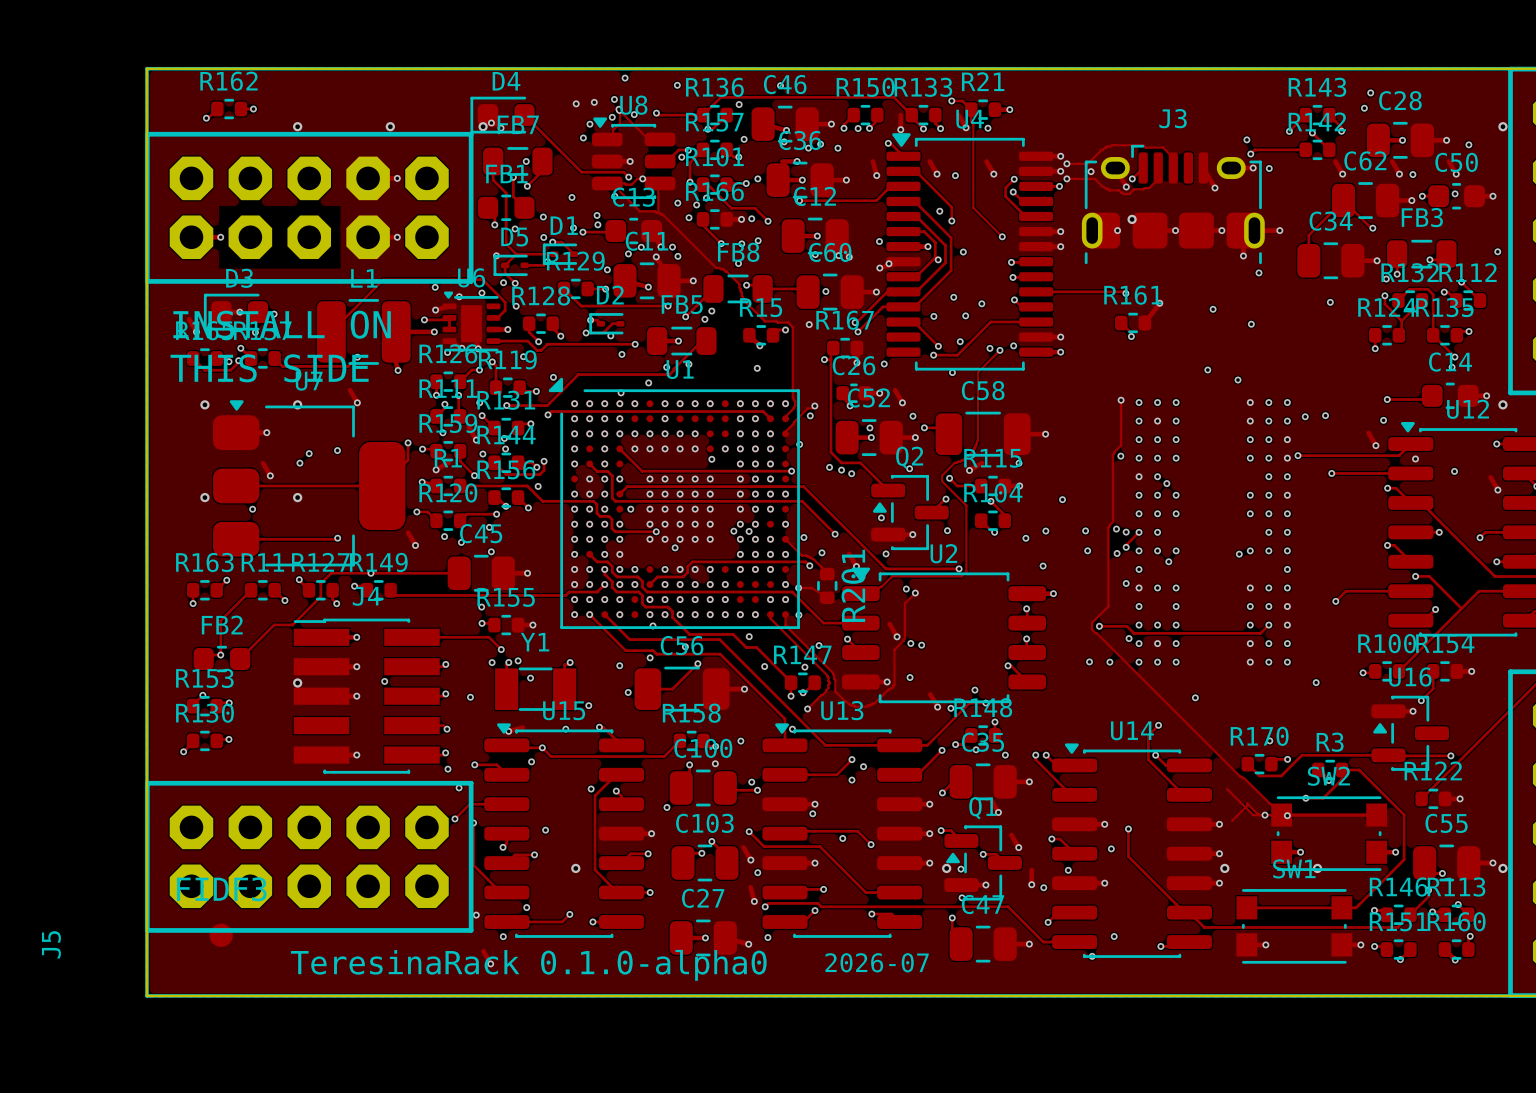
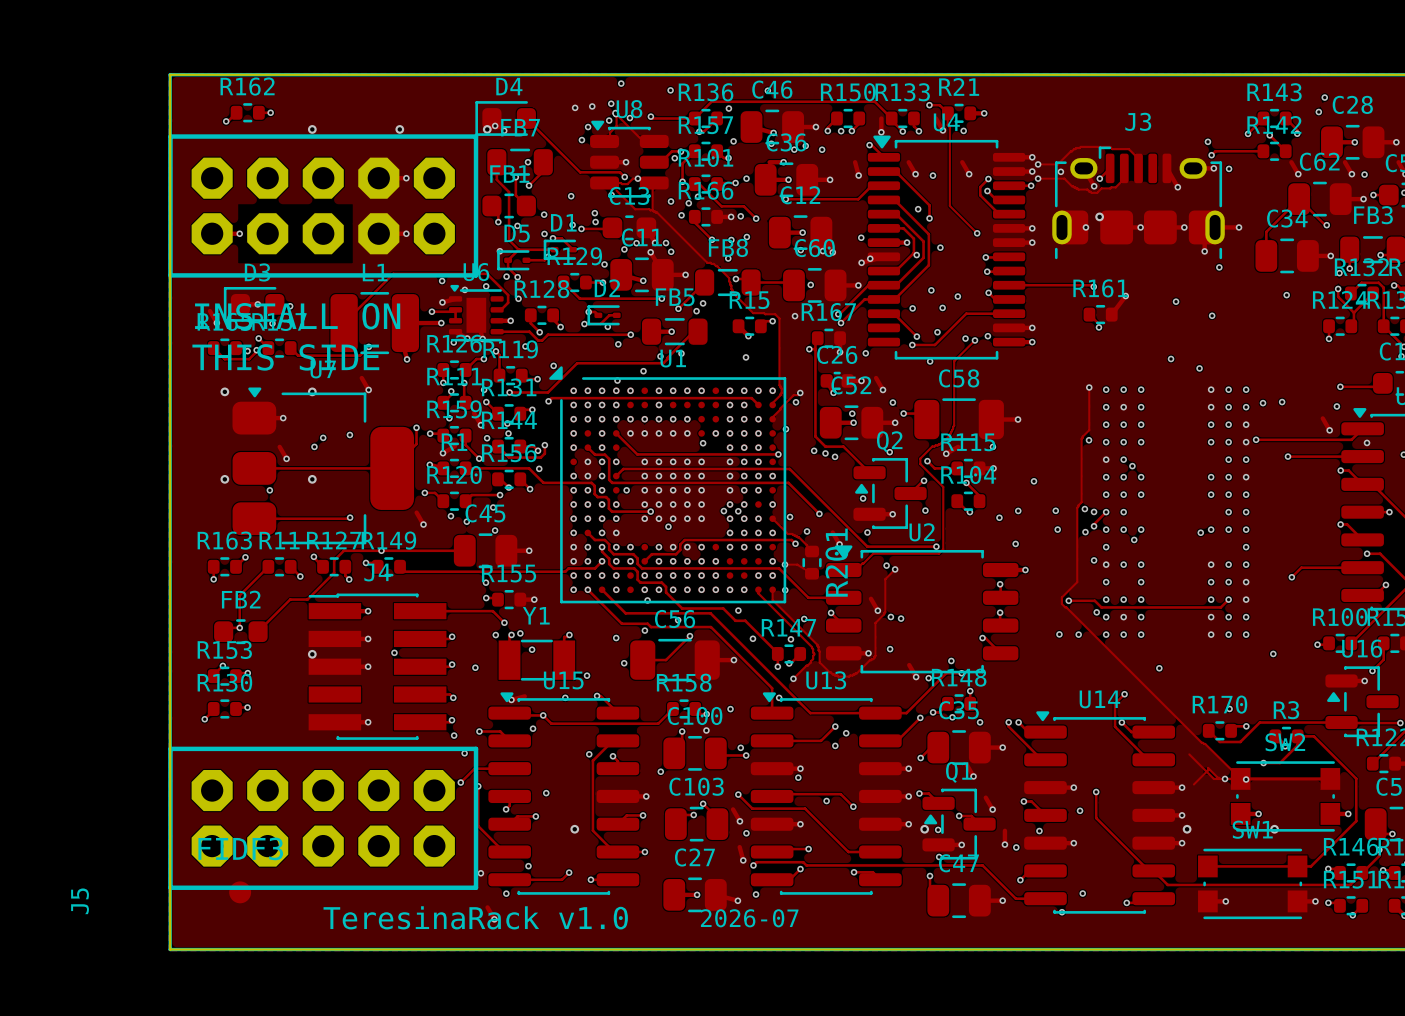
text position: 2026-07 (877, 962) -> 2026-07 (749, 918)
text: TeresinaRack 0.1.0-alpha0 (528, 965) -> TeresinaRack v1.0 (475, 917)

